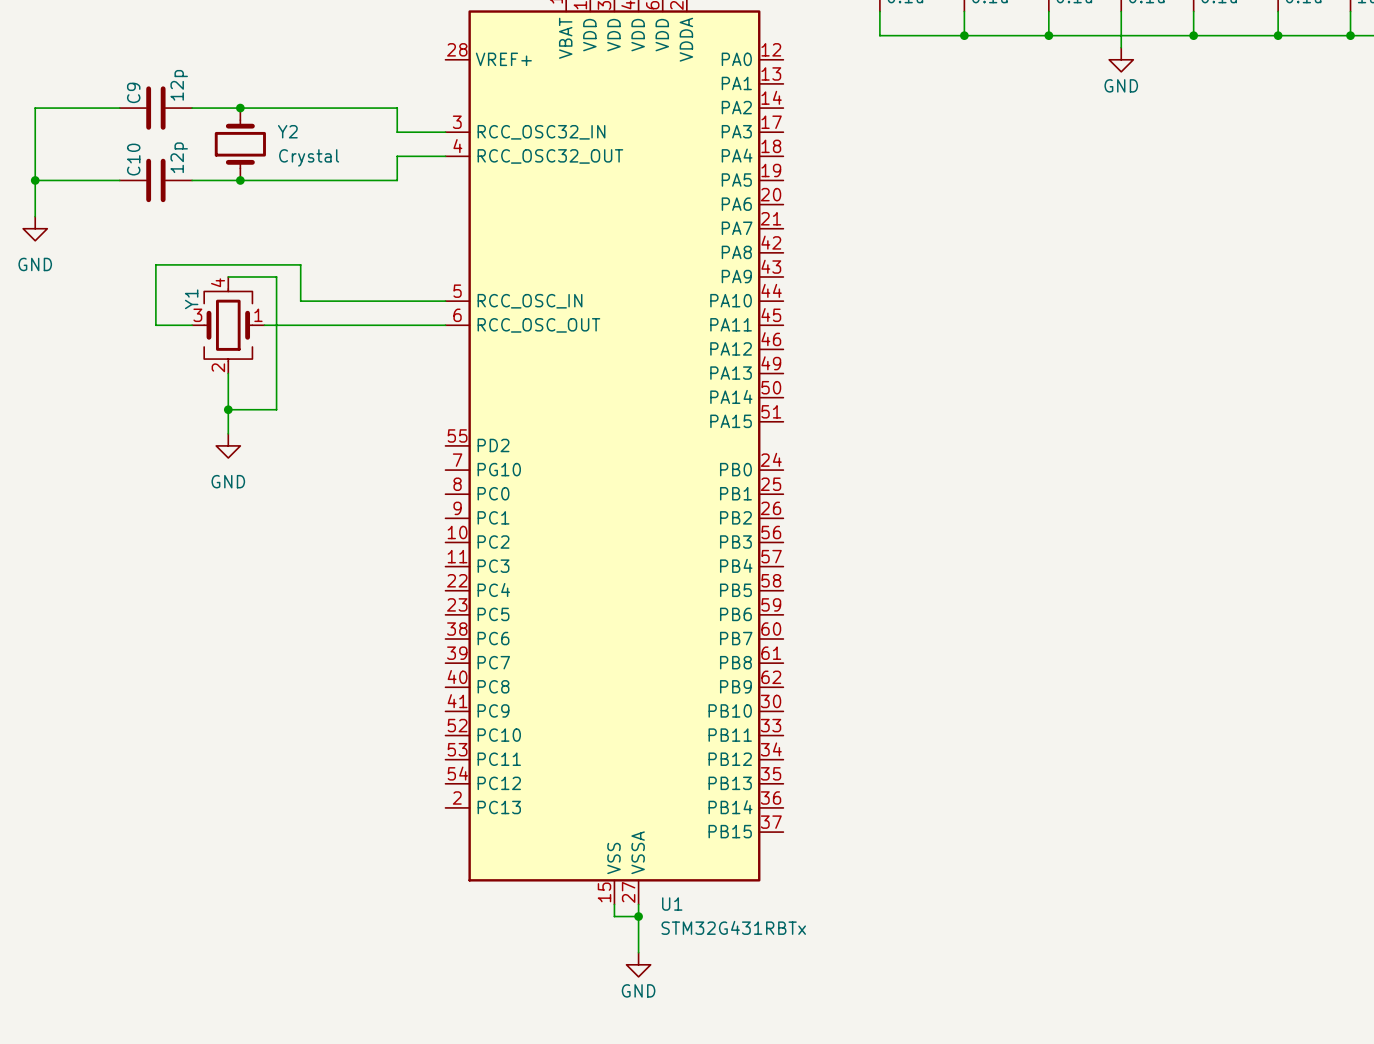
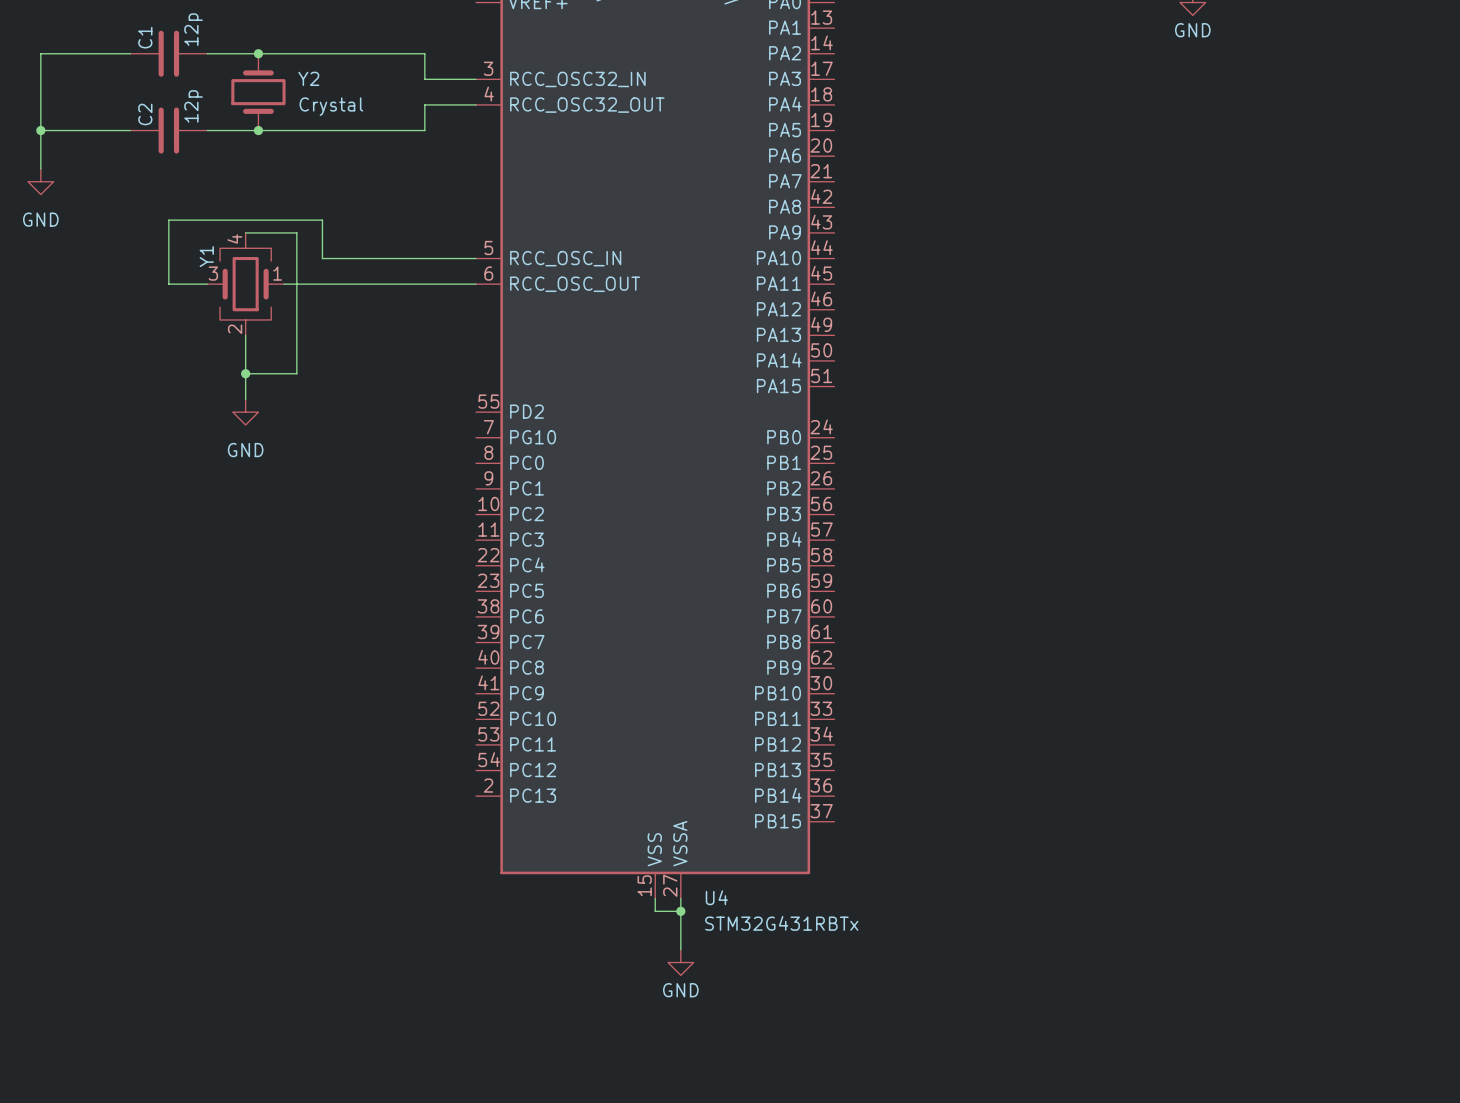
C9 name: C9 (133, 92) -> C1 (145, 37)
C10 name: C10 (133, 159) -> C2 (145, 114)
U1 name: U1 (672, 904) -> U4 (716, 897)

